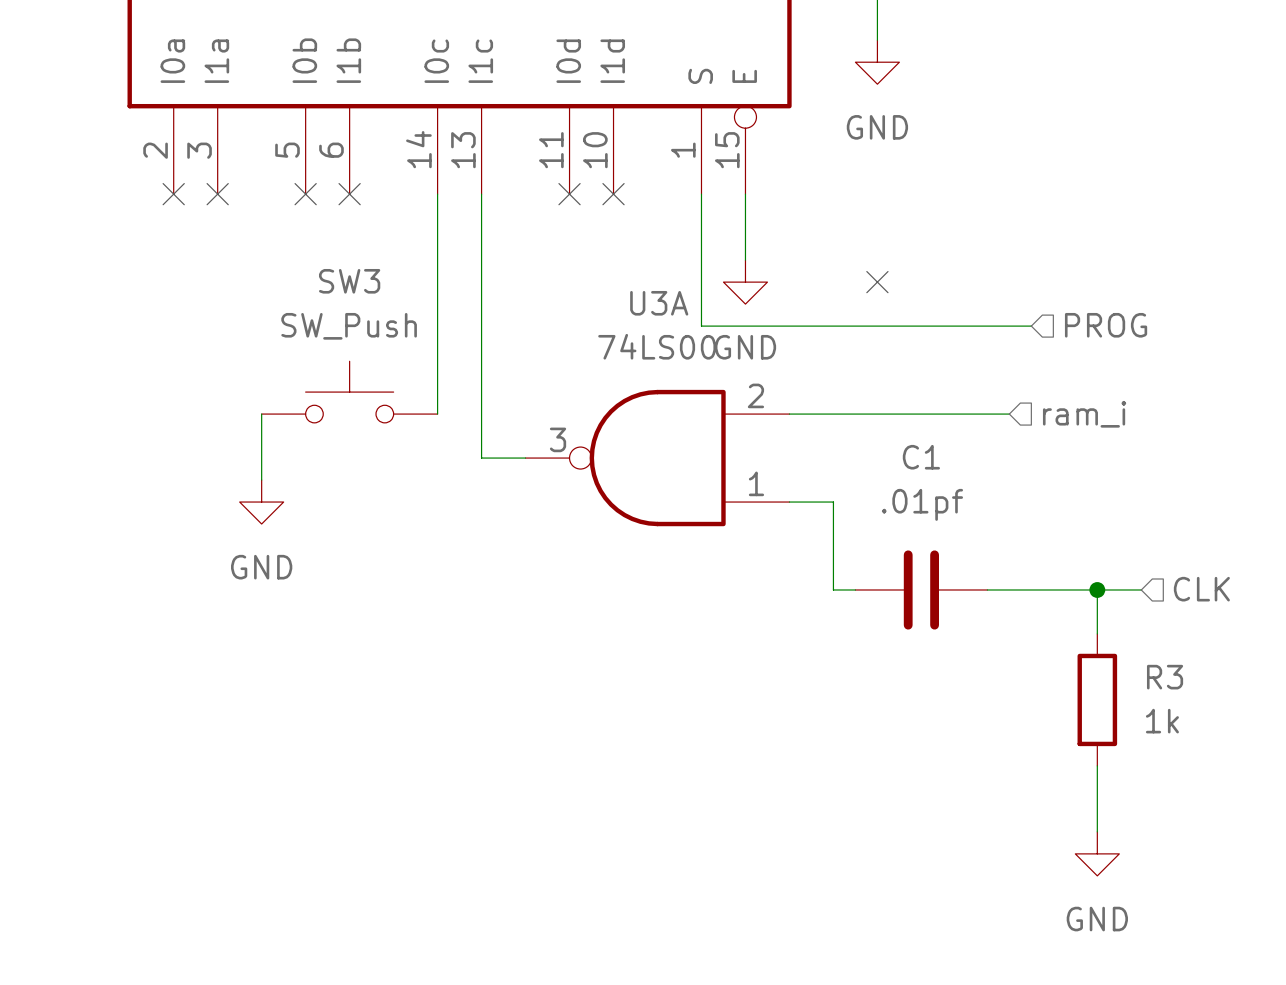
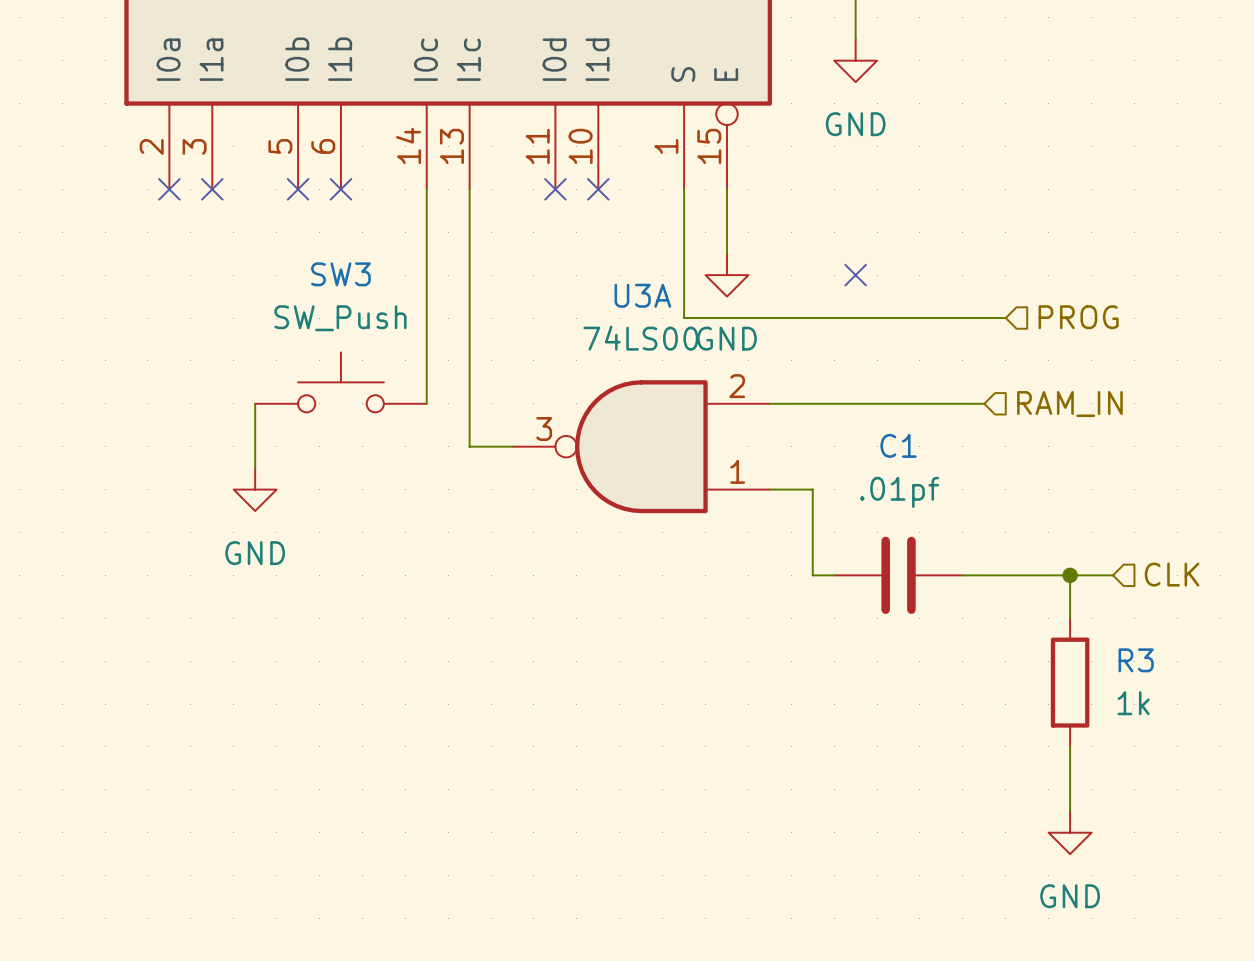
hierarchical label: ram_i (1084, 414) -> RAM_IN (1069, 404)

